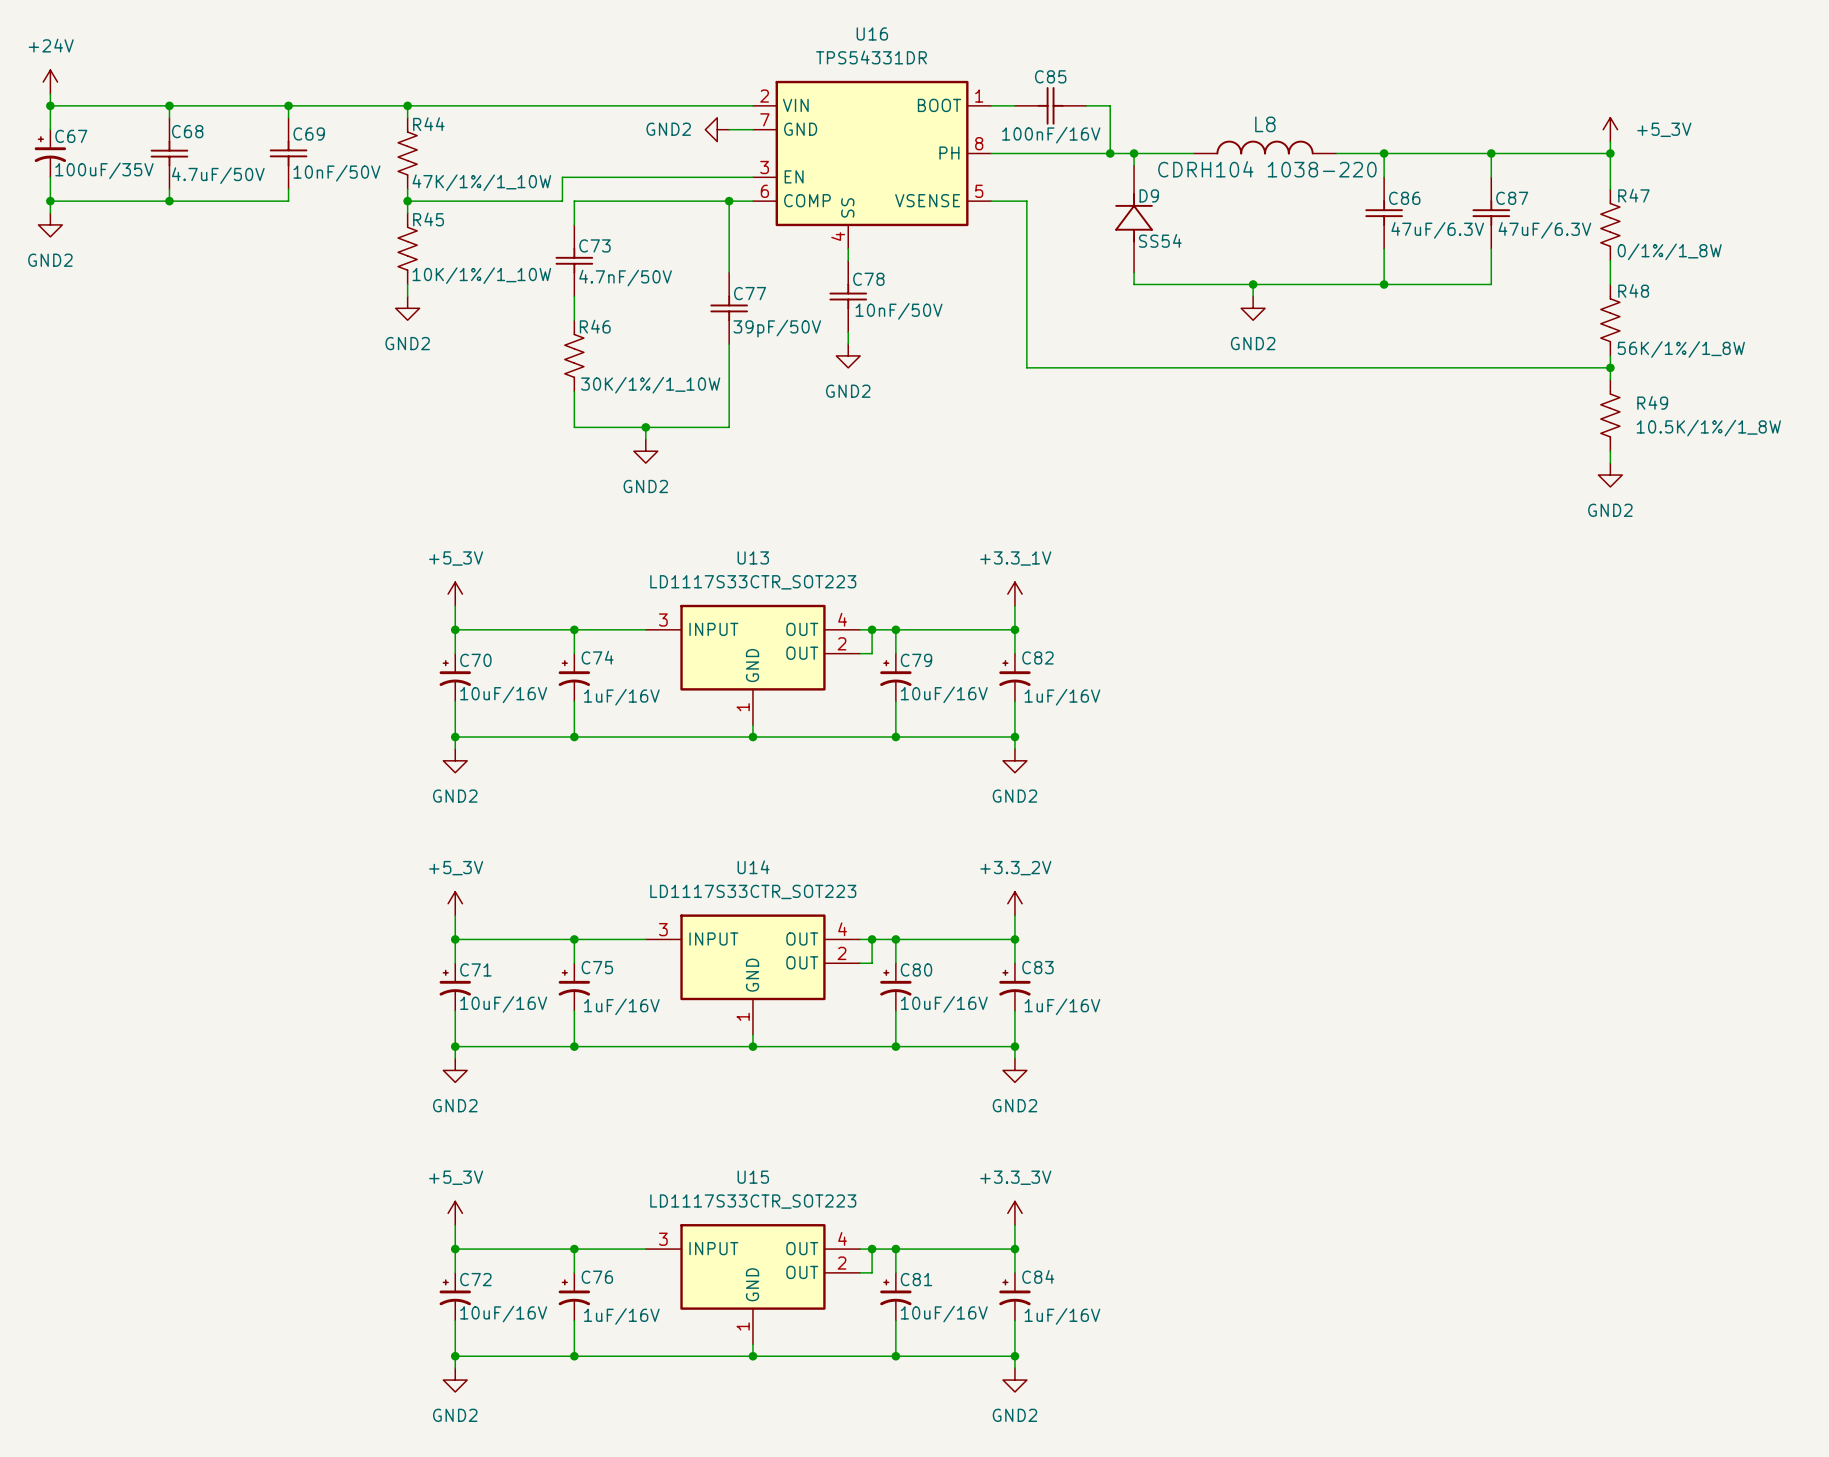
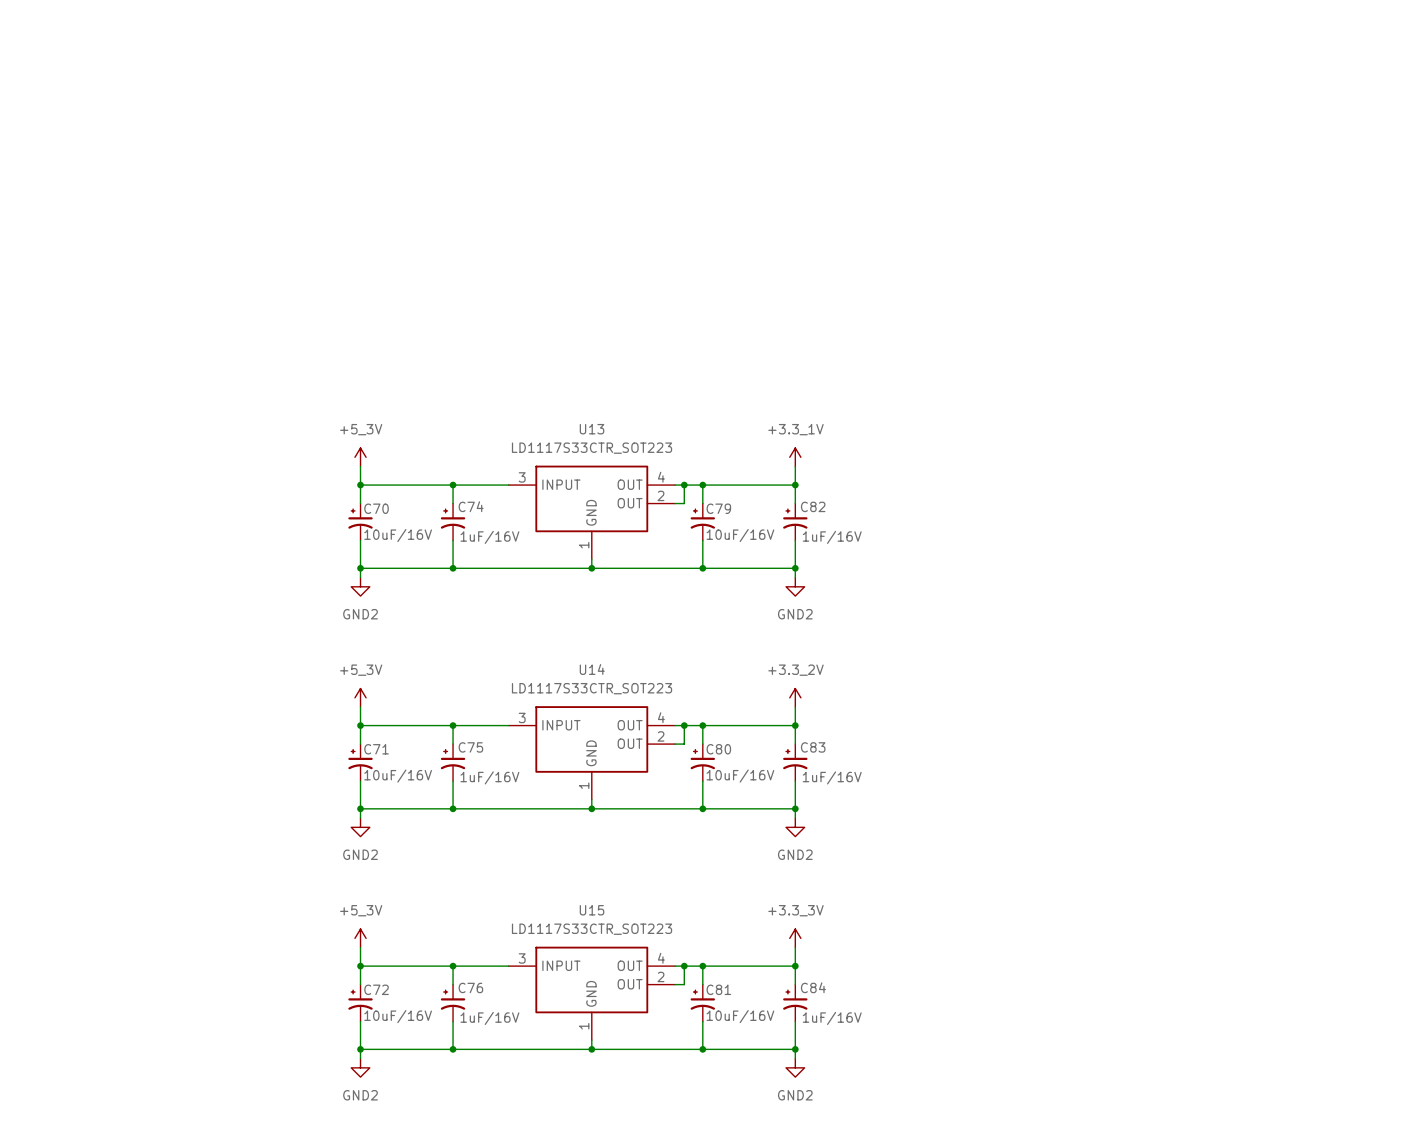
power symbol: +24V (50, 82) -> none
wire: (50, 93) (50, 129) -> none
wire: (50, 105) (752, 105) -> none
junction: (50, 105) -> none
wire: (169, 105) (169, 117) -> none
junction: (169, 105) -> none
wire: (288, 105) (288, 117) -> none
junction: (288, 105) -> none
wire: (407, 105) (407, 117) -> none
junction: (407, 105) -> none
wire: (991, 105) (1014, 105) -> none
C85: 100nF/16V (1050, 105) -> none
wire: (1086, 105) (1110, 105) (1110, 153) -> none
power symbol: GND2 (717, 129) -> none
wire: (729, 129) (752, 129) -> none
power symbol: +5_3V (1610, 129) -> none
wire: (1610, 141) (1610, 189) -> none
L8: CDRH104 1038-220 (1265, 147) -> none
C67: 100uF/35V (50, 153) -> none
C68: 4.7uF/50V (169, 153) -> none
C69: 10nF/50V (288, 153) -> none
R44: 47K/1%/1_10W (407, 153) -> none
wire: (991, 153) (1193, 153) -> none
junction: (1110, 153) -> none
wire: (1134, 153) (1134, 165) -> none
junction: (1134, 153) -> none
wire: (1336, 153) (1610, 153) -> none
wire: (1384, 153) (1384, 177) -> none
junction: (1384, 153) -> none
wire: (1491, 153) (1491, 177) -> none
junction: (1491, 153) -> none
junction: (1610, 153) -> none
U16: TPS54331DR (872, 164) -> none
wire: (50, 177) (50, 213) -> none
wire: (752, 177) (562, 177) (562, 201) (407, 201) -> none
wire: (169, 189) (169, 201) -> none
wire: (288, 189) (288, 201) (50, 201) -> none
wire: (407, 189) (407, 213) -> none
junction: (50, 201) -> none
junction: (169, 201) -> none
junction: (407, 201) -> none
wire: (729, 201) (729, 272) -> none
junction: (729, 201) -> none
wire: (752, 201) (574, 201) (574, 224) -> none
wire: (991, 201) (1026, 201) (1026, 367) (1610, 367) -> none
C86: 47uF/6.3V (1384, 213) -> none
C87: 47uF/6.3V (1491, 213) -> none
D9: SS54 (1134, 218) -> none
power symbol: GND2 (50, 224) -> none
R47: 0/1%/1_8W (1610, 224) -> none
R45: 10K/1%/1_10W (407, 248) -> none
wire: (848, 248) (848, 260) -> none
wire: (1384, 248) (1384, 284) -> none
wire: (1491, 248) (1491, 284) (1134, 284) (1134, 272) -> none
C73: 4.7nF/50V (574, 260) -> none
wire: (1610, 260) (1610, 284) -> none
wire: (407, 284) (407, 296) -> none
wire: (1253, 284) (1253, 296) -> none
junction: (1253, 284) -> none
junction: (1384, 284) -> none
wire: (574, 296) (574, 320) -> none
C78: 10nF/50V (848, 296) -> none
power symbol: GND2 (407, 308) -> none
C77: 39pF/50V (729, 308) -> none
power symbol: GND2 (1253, 308) -> none
R48: 56K/1%/1_8W (1610, 320) -> none
wire: (848, 332) (848, 344) -> none
wire: (729, 344) (729, 427) (574, 427) (574, 391) -> none
R46: 30K/1%/1_10W (574, 355) -> none
power symbol: GND2 (848, 355) -> none
wire: (1610, 355) (1610, 379) -> none
junction: (1610, 367) -> none
R49: 10.5K/1%/1_8W (1610, 415) -> none
wire: (645, 427) (645, 439) -> none
junction: (645, 427) -> none
power symbol: GND2 (645, 451) -> none
wire: (1610, 451) (1610, 463) -> none
power symbol: GND2 (1610, 475) -> none

